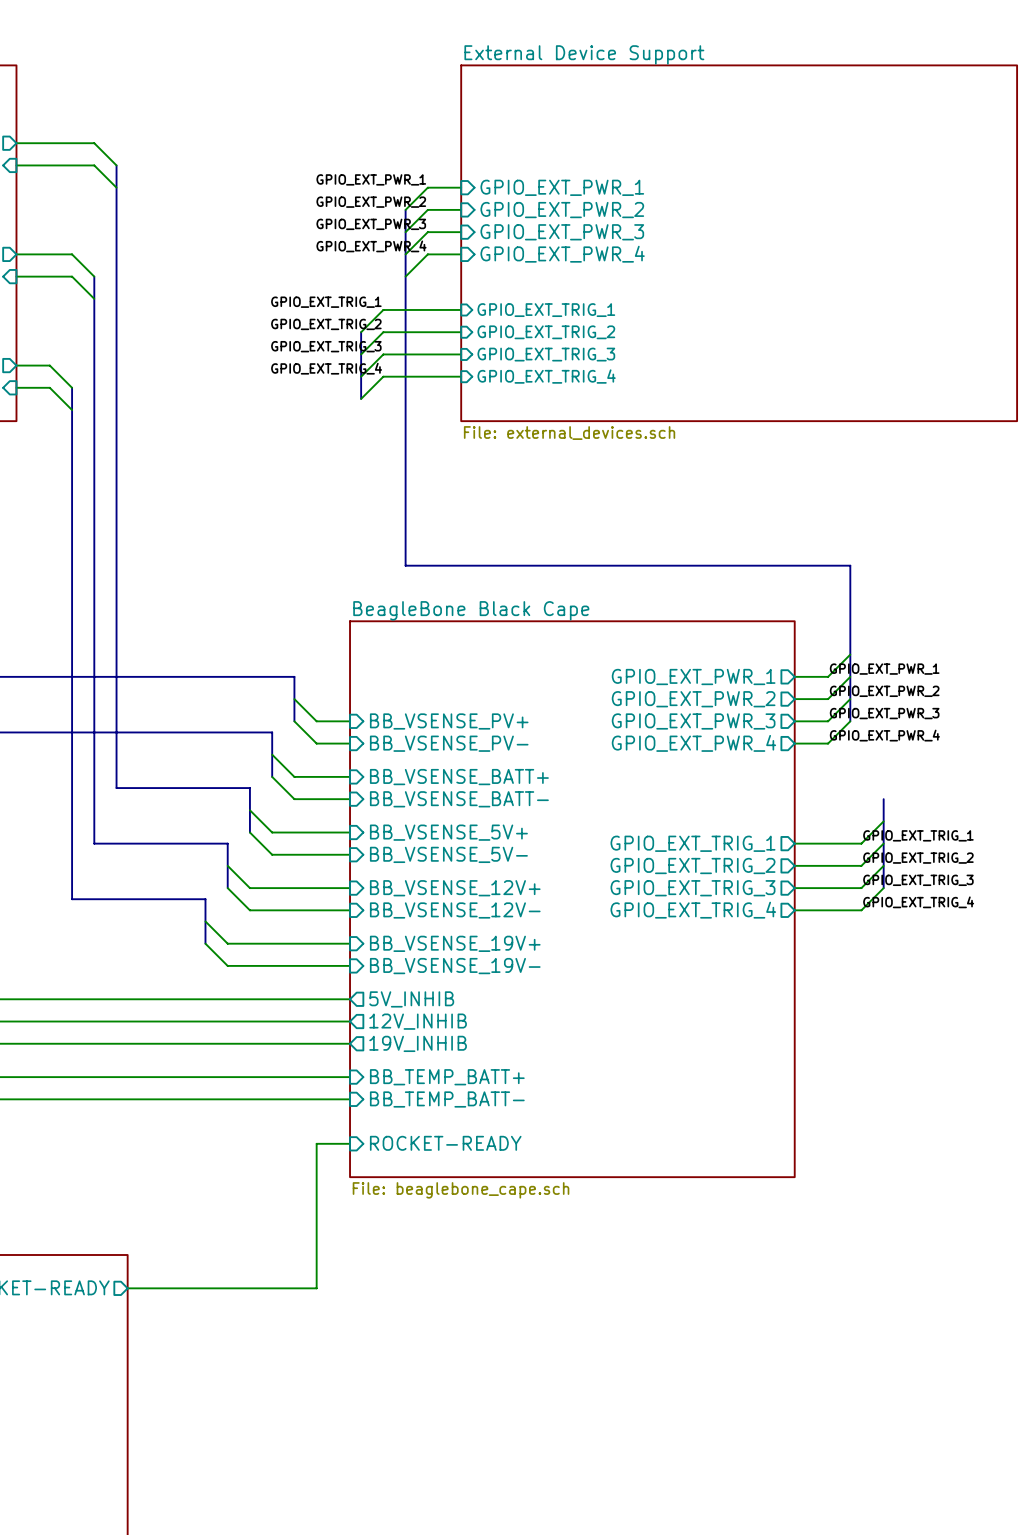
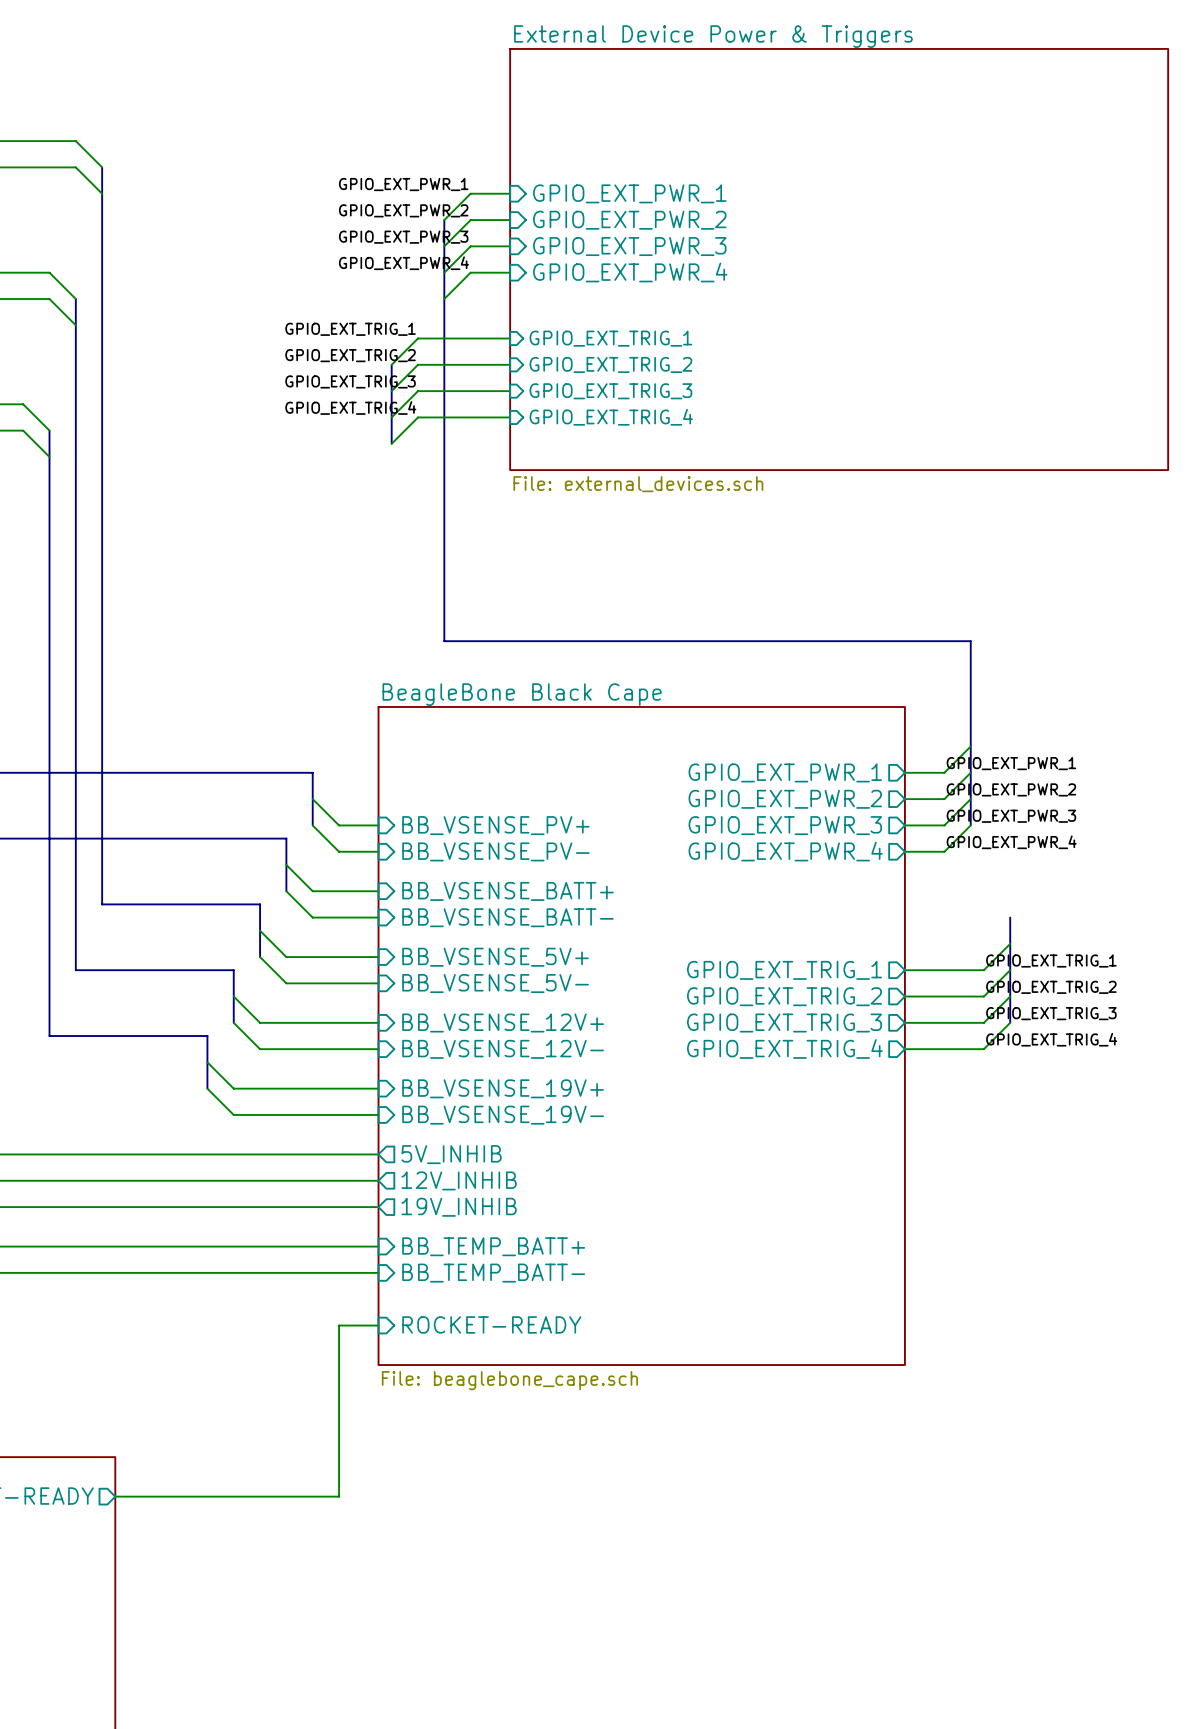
sheet External Device Support name: External Device Support (584, 54) -> External Device Power & Triggers (713, 36)

